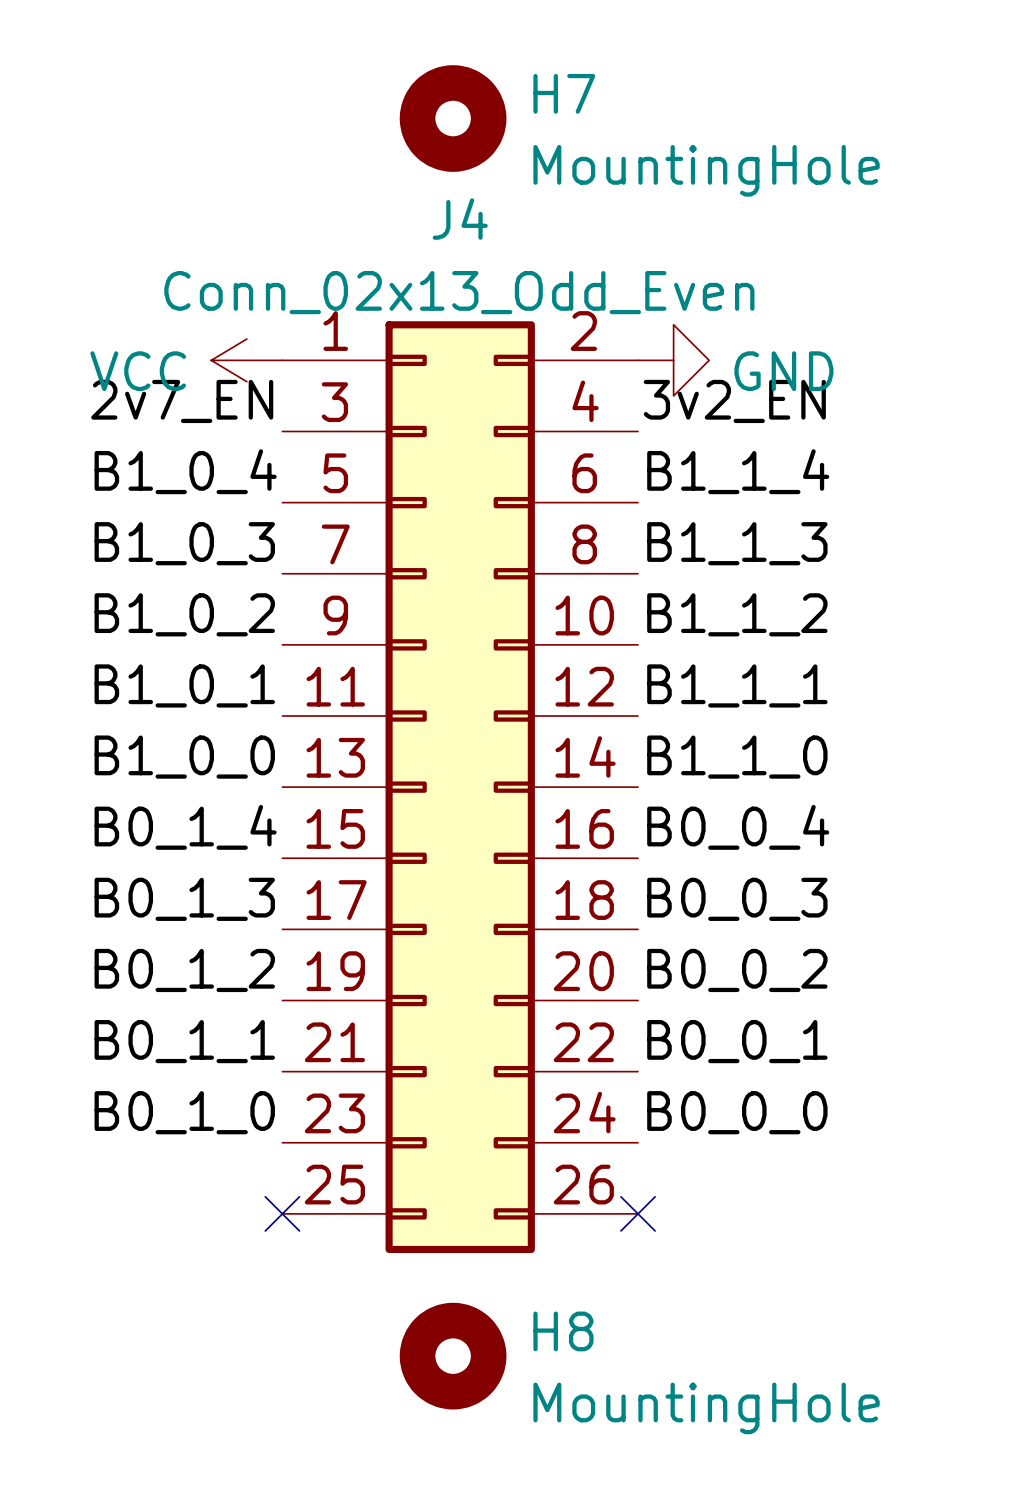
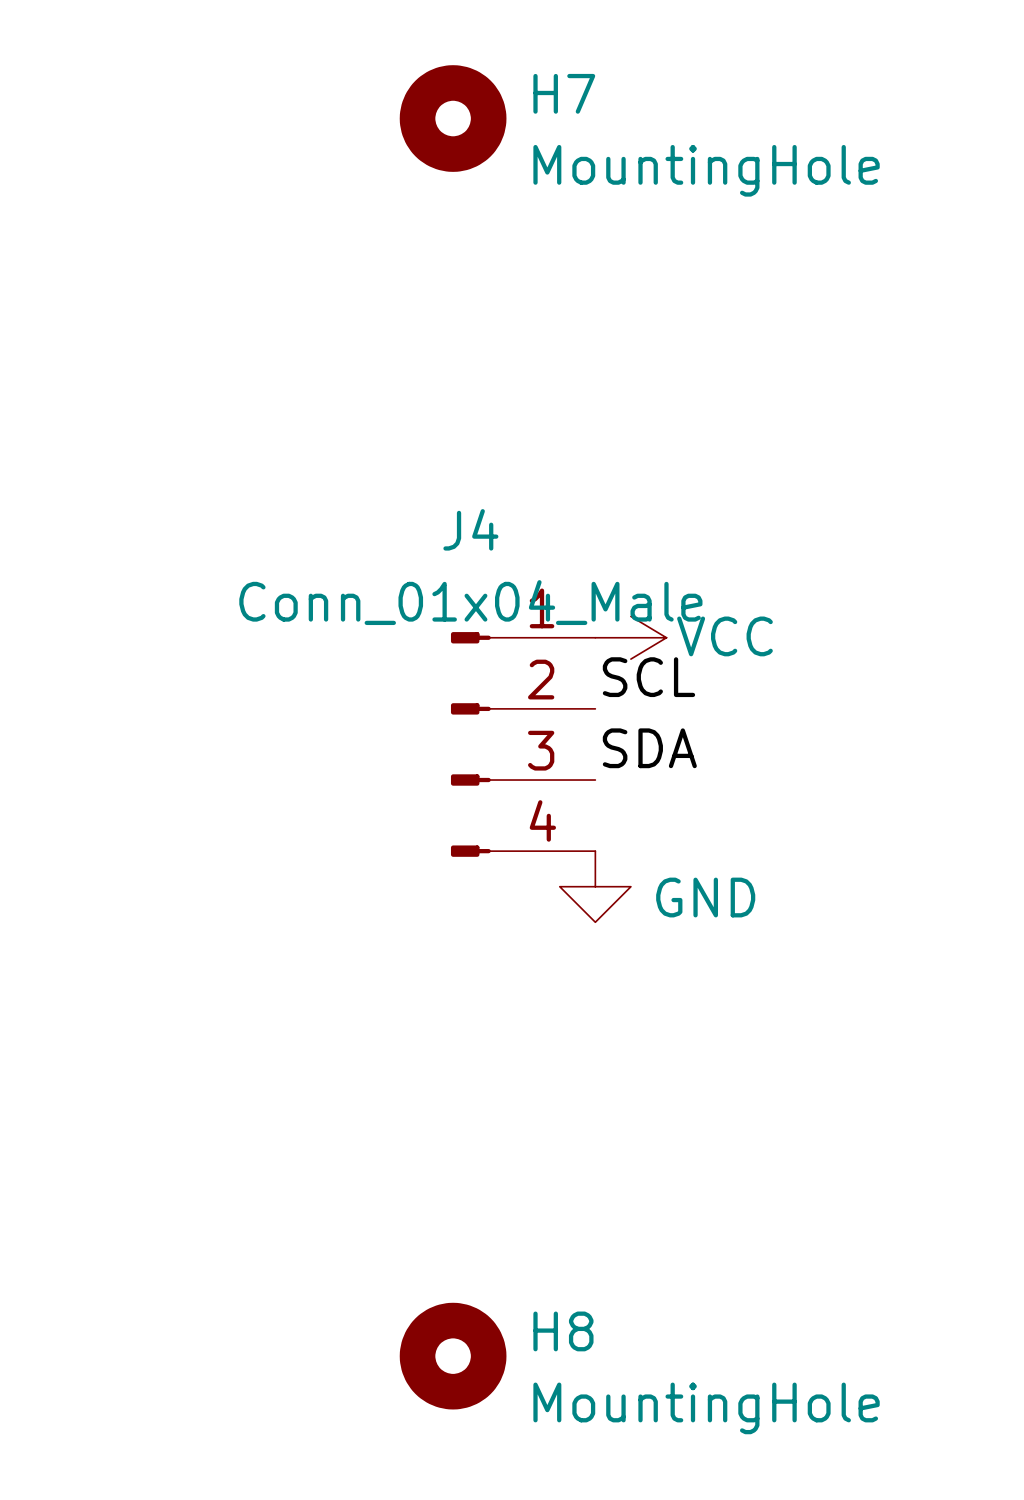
J4 name position: J4 (460, 219) -> J4 (470, 529)
J4 value: Conn_02x13_Odd_Even (459, 292) -> Conn_01x04_Male (470, 602)
J4 symbol: [282, 321, 639, 1254] -> [450, 632, 596, 857]
power symbol rotation: 0° (246, 360) -> 180° (630, 637)
power symbol position: VCC (246, 360) -> VCC (630, 637)
power symbol rotation: 0° (673, 360) -> 90° clockwise (595, 886)
power symbol position: GND (673, 360) -> GND (595, 886)
label: 2v7_EN (182, 401) -> none
label: 3v2_EN (734, 401) -> none
label: B1_0_4 (185, 471) -> none
label: B1_1_4 (738, 471) -> none
label: B1_0_3 (184, 543) -> none
label: B1_1_3 (737, 543) -> none
label: B1_0_2 (184, 614) -> none
label: B1_1_2 (737, 614) -> none
label: none -> SCL (648, 677)
label: B1_0_1 (184, 685) -> none
label: B1_1_1 (737, 685) -> none
label: none -> SDA (649, 748)
label: B1_0_0 (184, 757) -> none
label: B1_1_0 (737, 757) -> none
label: B0_1_4 (185, 827) -> none
label: B0_0_4 (738, 827) -> none
label: B0_1_3 (184, 899) -> none
label: B0_0_3 (737, 899) -> none
label: B0_1_2 (184, 970) -> none
label: B0_0_2 (737, 970) -> none
label: B0_1_1 (184, 1041) -> none
label: B0_0_1 (737, 1041) -> none
label: B0_1_0 (184, 1112) -> none
label: B0_0_0 (737, 1112) -> none
no-connect mark: (282, 1213) -> none
no-connect mark: (638, 1213) -> none

